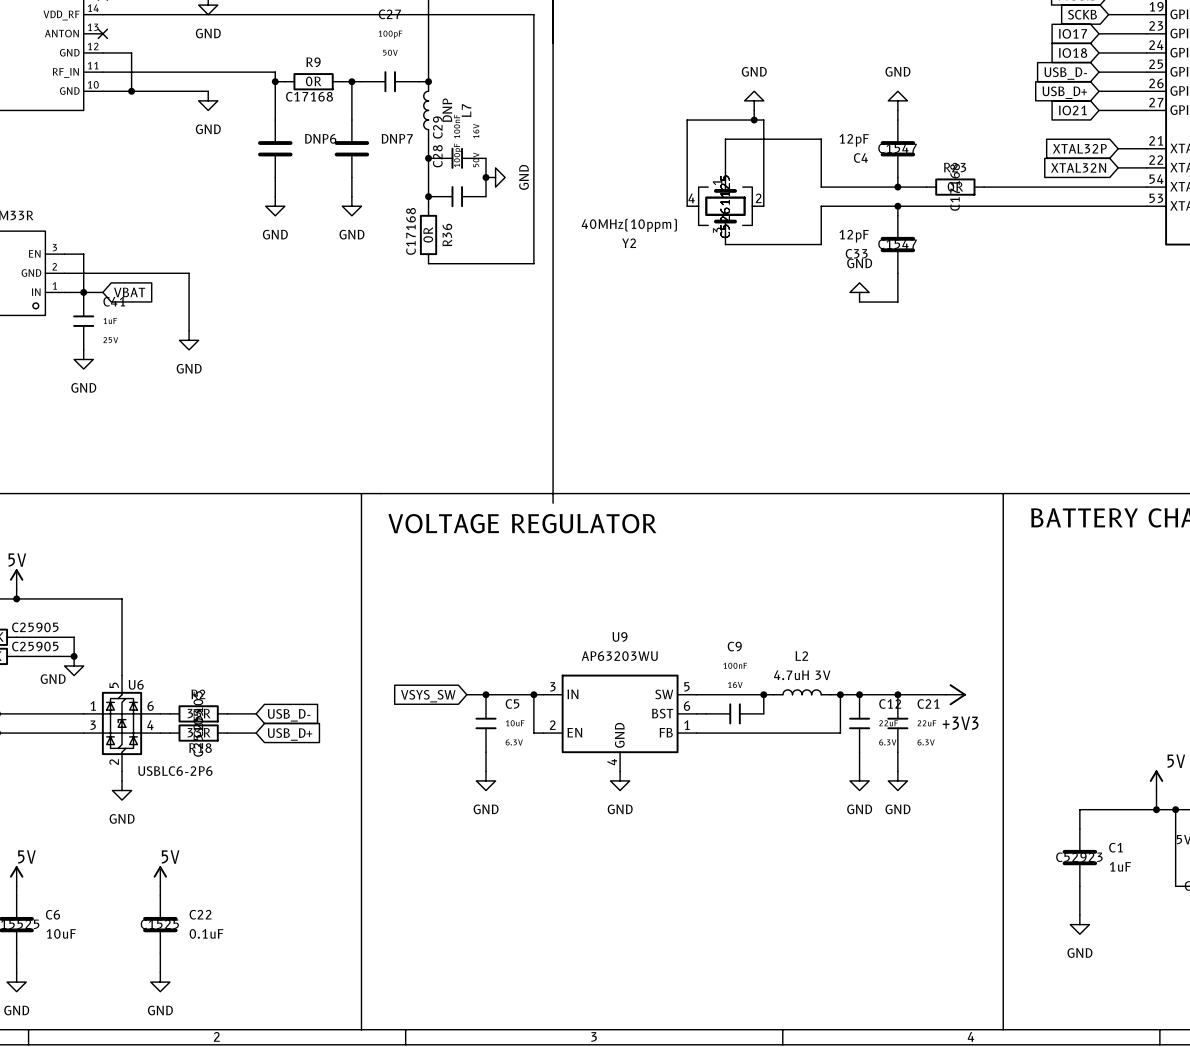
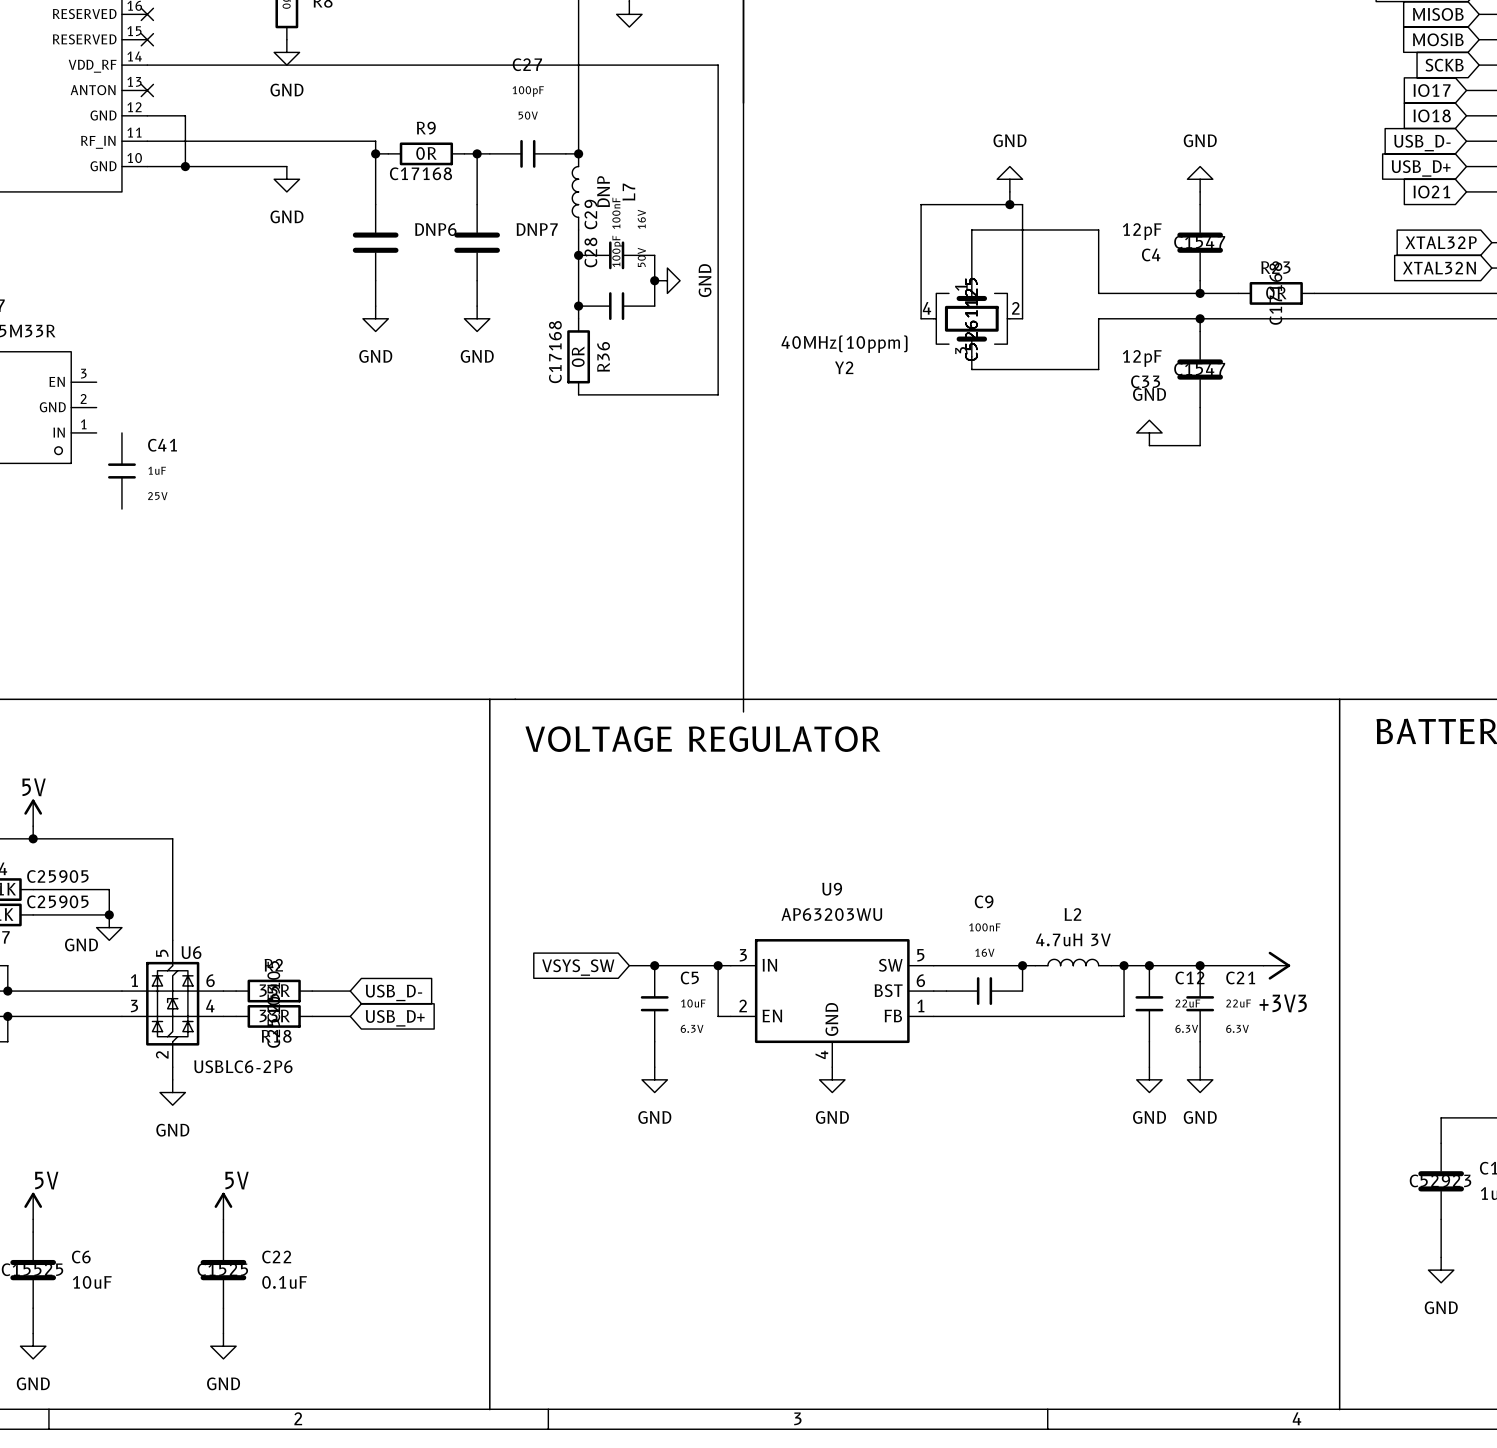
wire: (64, 254) (83, 254) (83, 292) -> none
wire: (64, 273) (189, 273) (189, 330) -> none
wire: (64, 292) (102, 292) -> none
junction: (83, 292) -> none
global label: VBAT (129, 292) -> none
power symbol: GND (189, 340) -> none
power symbol: GND (83, 359) -> none

